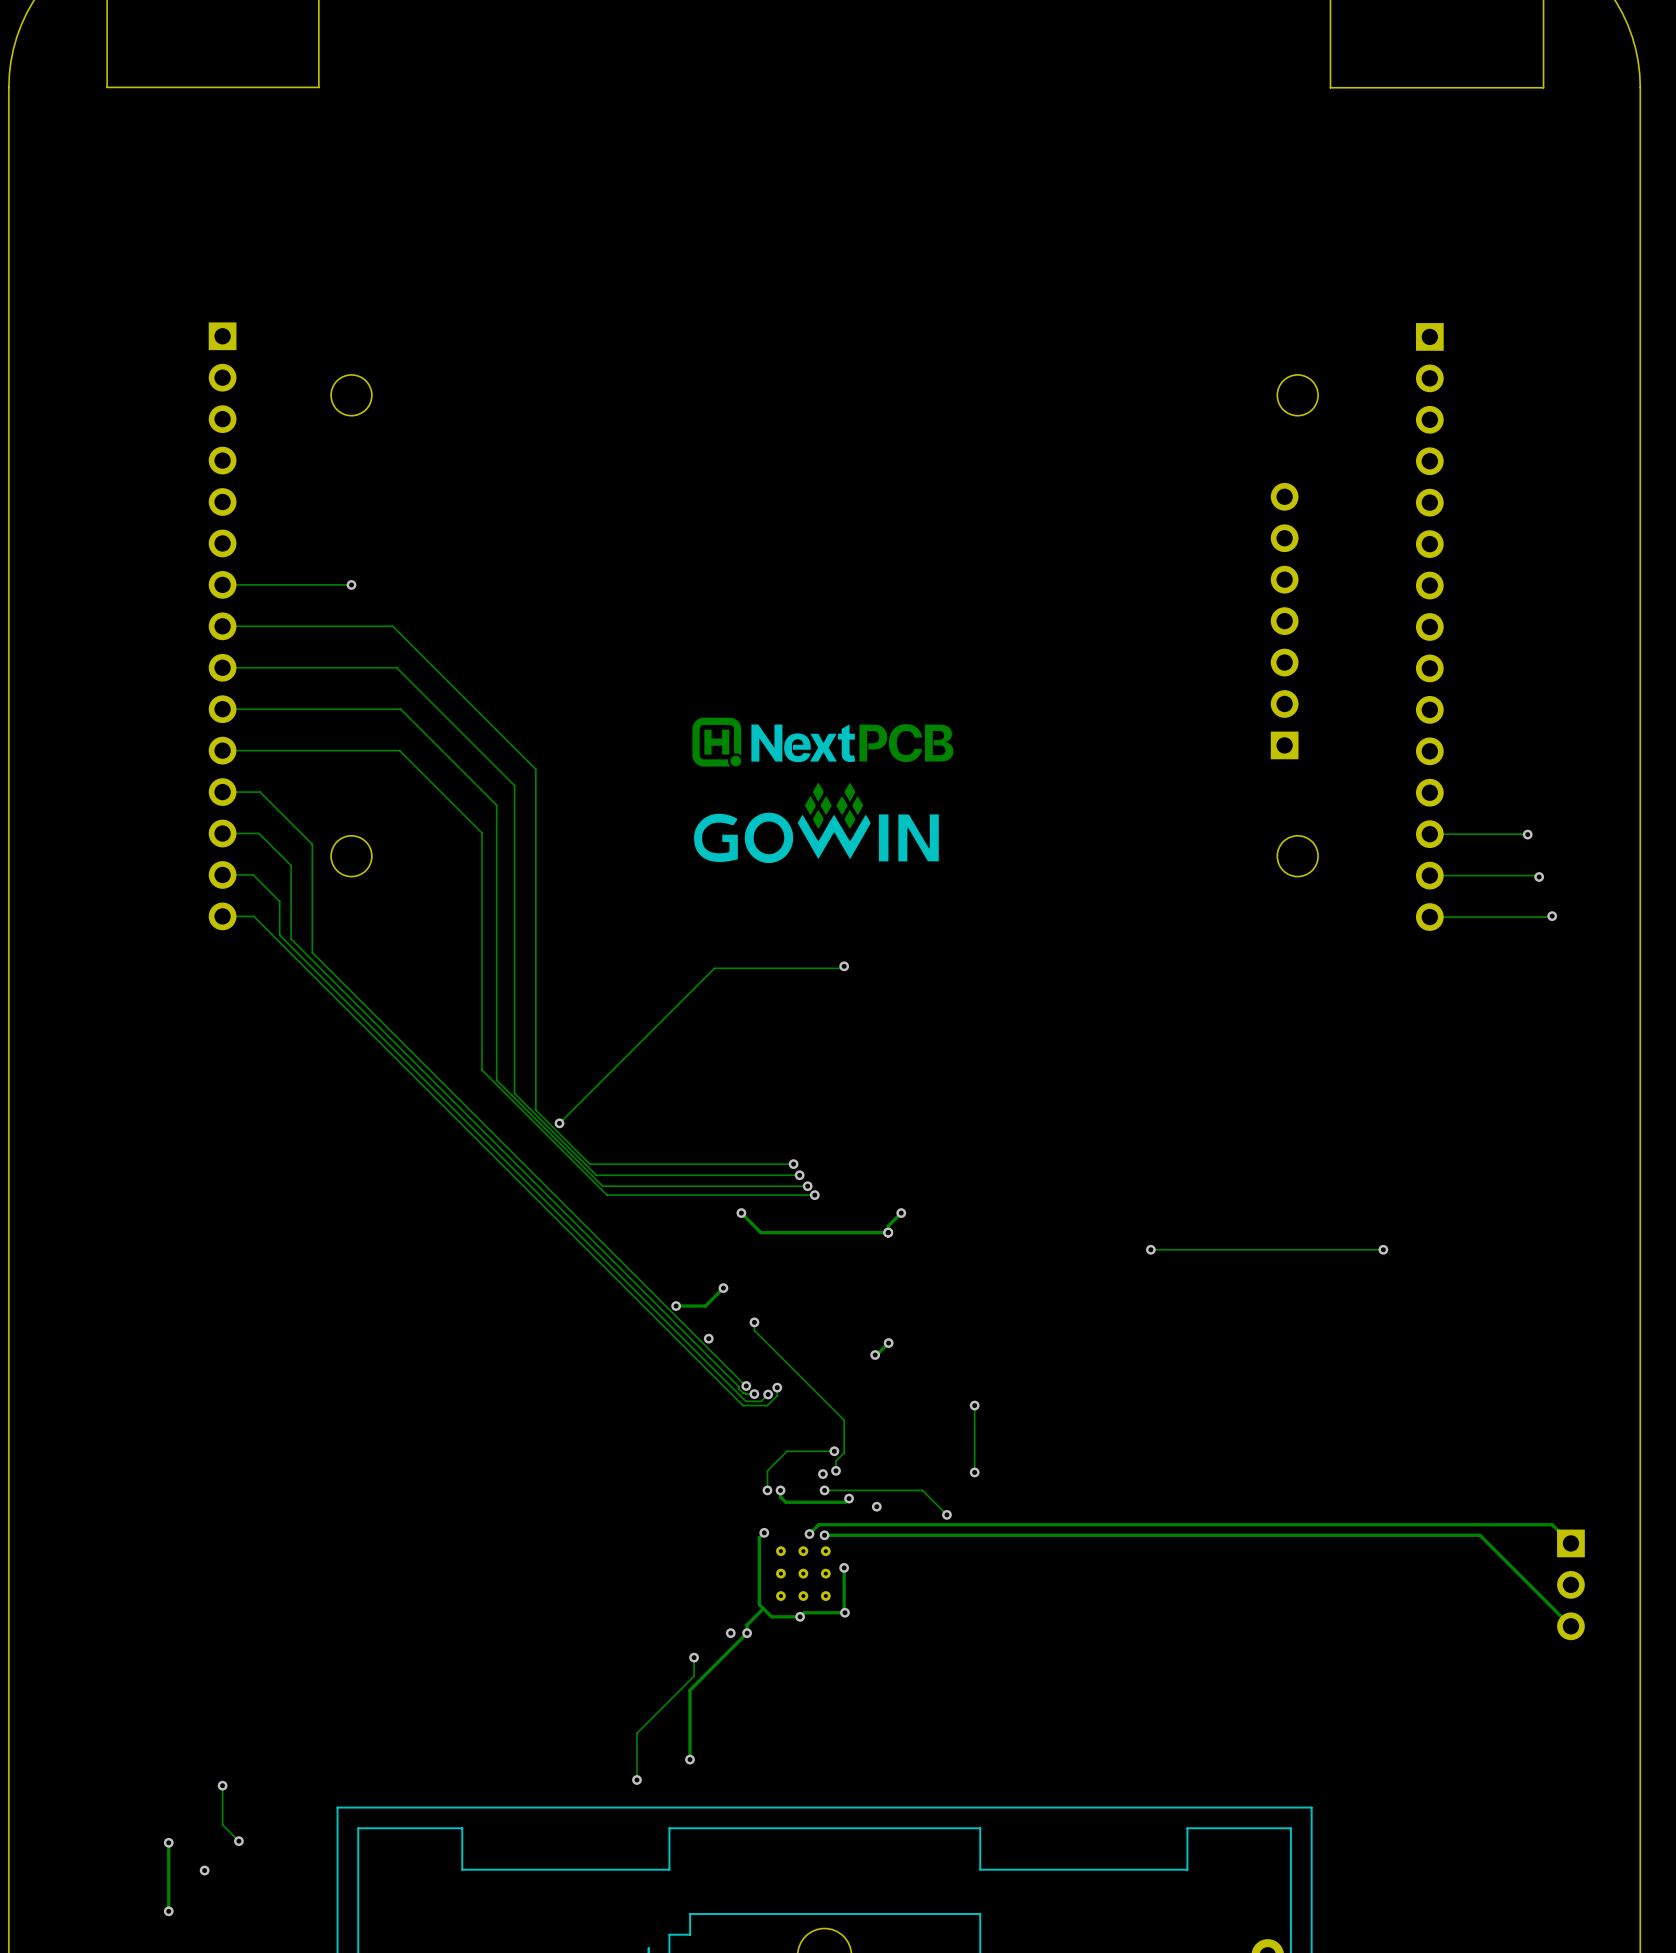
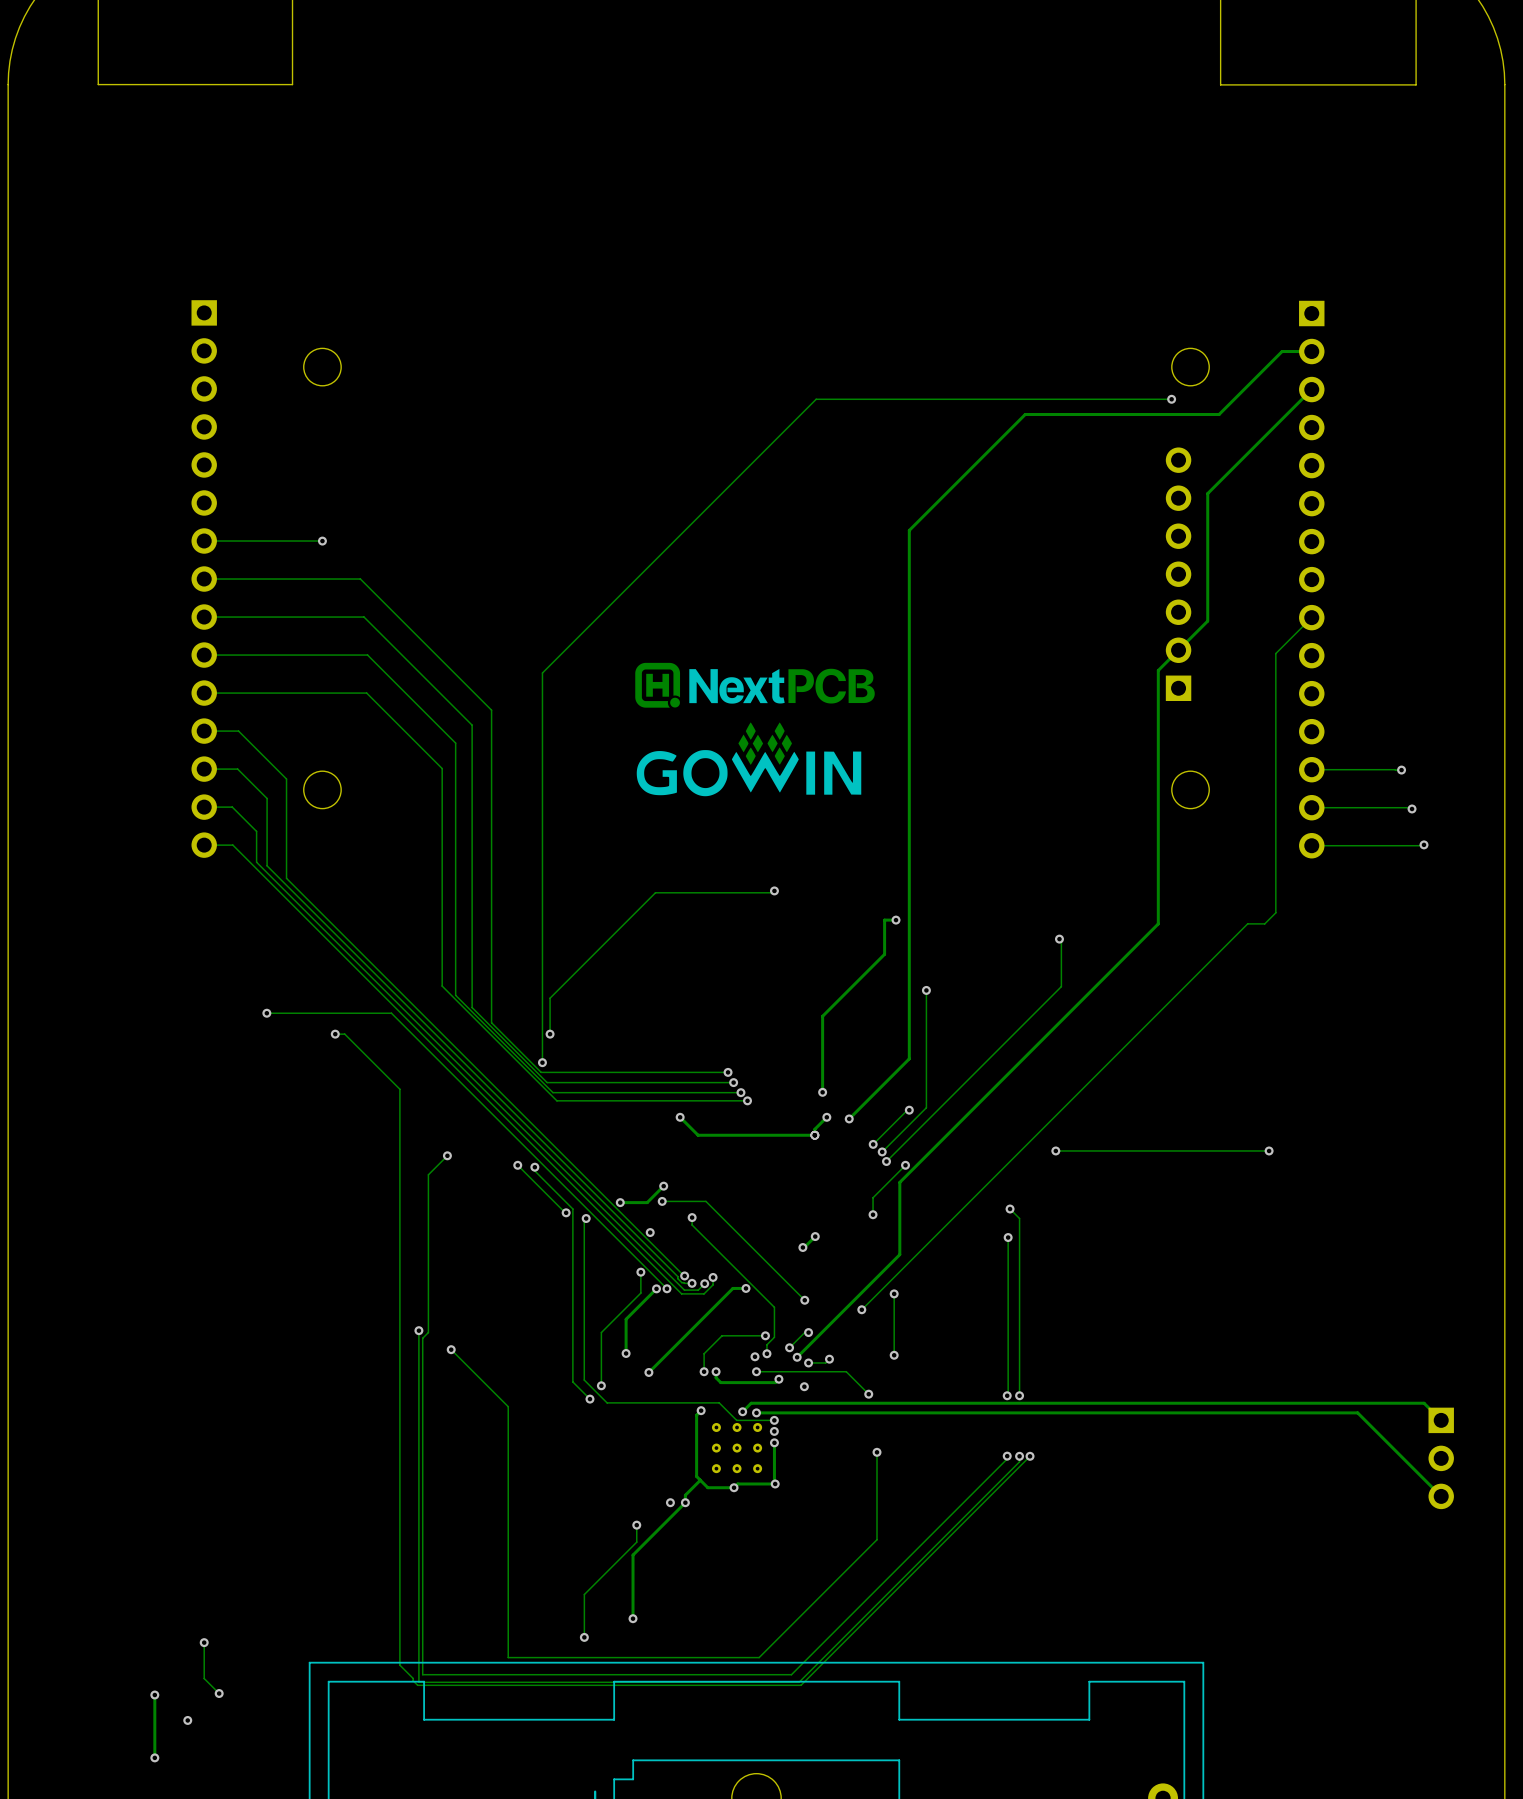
track: none -> (1311, 351) (1282, 351) (1219, 414) (1025, 414) (909, 530) (909, 1058) (849, 1118)
track: none -> (1311, 389) (1207, 493) (1207, 621) (1158, 670) (1158, 923) (899, 1182) (899, 1254) (797, 1357)
track: none -> (1171, 399) (816, 399) (542, 672) (542, 1062)
via: none -> (1171, 399)
track: none -> (1311, 617) (1275, 653) (1275, 912) (1264, 923) (1247, 923) (861, 1309)
track: none -> (896, 920) (884, 920) (884, 954) (822, 1016) (822, 1092)
via: none -> (896, 920)
track: none -> (1059, 939) (1061, 941) (1061, 986) (886, 1161)
via: none -> (1059, 939)
track: none -> (926, 990) (926, 1107) (882, 1151)
via: none -> (926, 990)
track: (599, 1083) (559, 1123) -> (550, 998) (550, 1034)
track: none -> (264, 1011) (266, 1013) (391, 1013) (666, 1288)
via: none -> (266, 1013)
track: none -> (335, 1034) (344, 1034) (399, 1089) (399, 1665) (417, 1685) (801, 1685) (1030, 1456)
via: none -> (335, 1034)
via: none -> (550, 1034)
via: (559, 1123) -> none
via: none -> (542, 1062)
via: none -> (822, 1092)
track: none -> (909, 1110) (873, 1144)
via: none -> (909, 1110)
via: none -> (849, 1118)
via: none -> (873, 1144)
via: none -> (882, 1151)
track: none -> (447, 1155) (428, 1174) (428, 1332) (422, 1338) (422, 1674) (791, 1674) (1007, 1458) (1007, 1456)
via: none -> (447, 1155)
via: none -> (886, 1161)
track: none -> (517, 1165) (566, 1212)
via: none -> (517, 1165)
track: none -> (905, 1165) (873, 1197) (873, 1214)
via: none -> (905, 1165)
track: none -> (534, 1167) (534, 1171) (572, 1209) (572, 1381) (589, 1399)
via: none -> (534, 1167)
track: none -> (662, 1201) (705, 1201) (804, 1300)
via: none -> (662, 1201)
track: none -> (1010, 1209) (1019, 1218) (1019, 1395)
via: none -> (1010, 1209)
via: none -> (566, 1212)
via: none -> (873, 1214)
track: none -> (584, 1218) (584, 1380) (607, 1402) (719, 1402) (736, 1420) (774, 1420)
via: none -> (586, 1218)
track: none -> (1008, 1237) (1007, 1395)
via: none -> (1008, 1237)
track: none -> (640, 1272) (640, 1293) (601, 1332) (601, 1385)
via: none -> (640, 1272)
via: none -> (666, 1288)
track: none -> (745, 1288) (732, 1288) (648, 1372)
via: none -> (745, 1288)
track: none -> (656, 1288) (626, 1319) (626, 1353)
via: none -> (656, 1288)
via: none -> (804, 1300)
via: none -> (861, 1309)
track: none -> (418, 1330) (418, 1682) (799, 1682) (1019, 1461) (1019, 1456)
via: none -> (418, 1330)
track: none -> (808, 1332) (804, 1332) (789, 1347)
via: none -> (808, 1332)
via: none -> (789, 1347)
track: none -> (451, 1349) (508, 1406) (508, 1657) (759, 1657) (877, 1539) (877, 1452)
via: none -> (451, 1349)
via: none -> (626, 1353)
via: none -> (797, 1357)
track: none -> (829, 1359) (825, 1362) (808, 1362)
via: none -> (829, 1359)
via: none -> (808, 1362)
via: none -> (648, 1372)
via: none -> (601, 1385)
via: none -> (1007, 1395)
via: none -> (1019, 1395)
via: none -> (589, 1399)
via: none -> (774, 1420)
via: none -> (774, 1431)
via: none -> (877, 1452)
via: none -> (1007, 1456)
via: none -> (1019, 1456)
via: none -> (1030, 1456)

